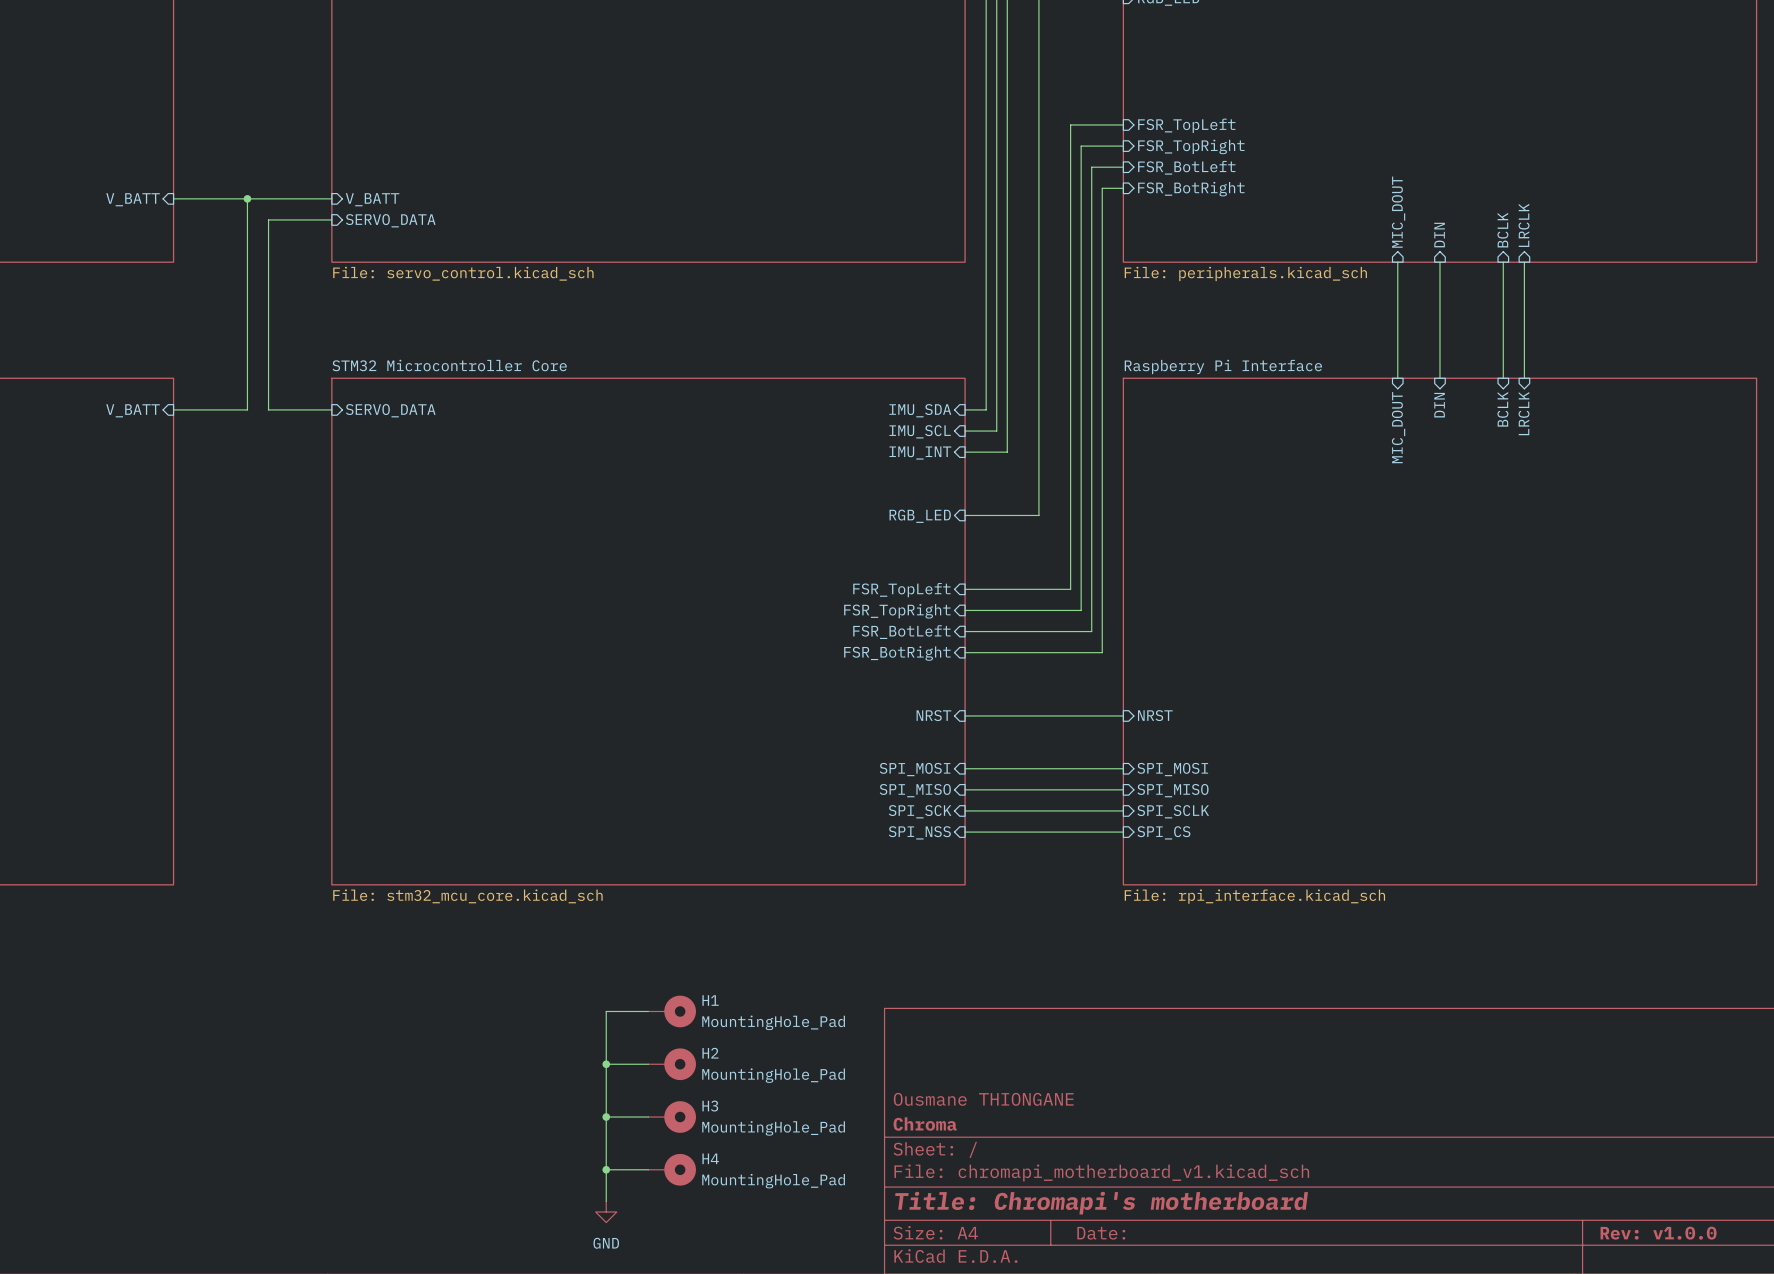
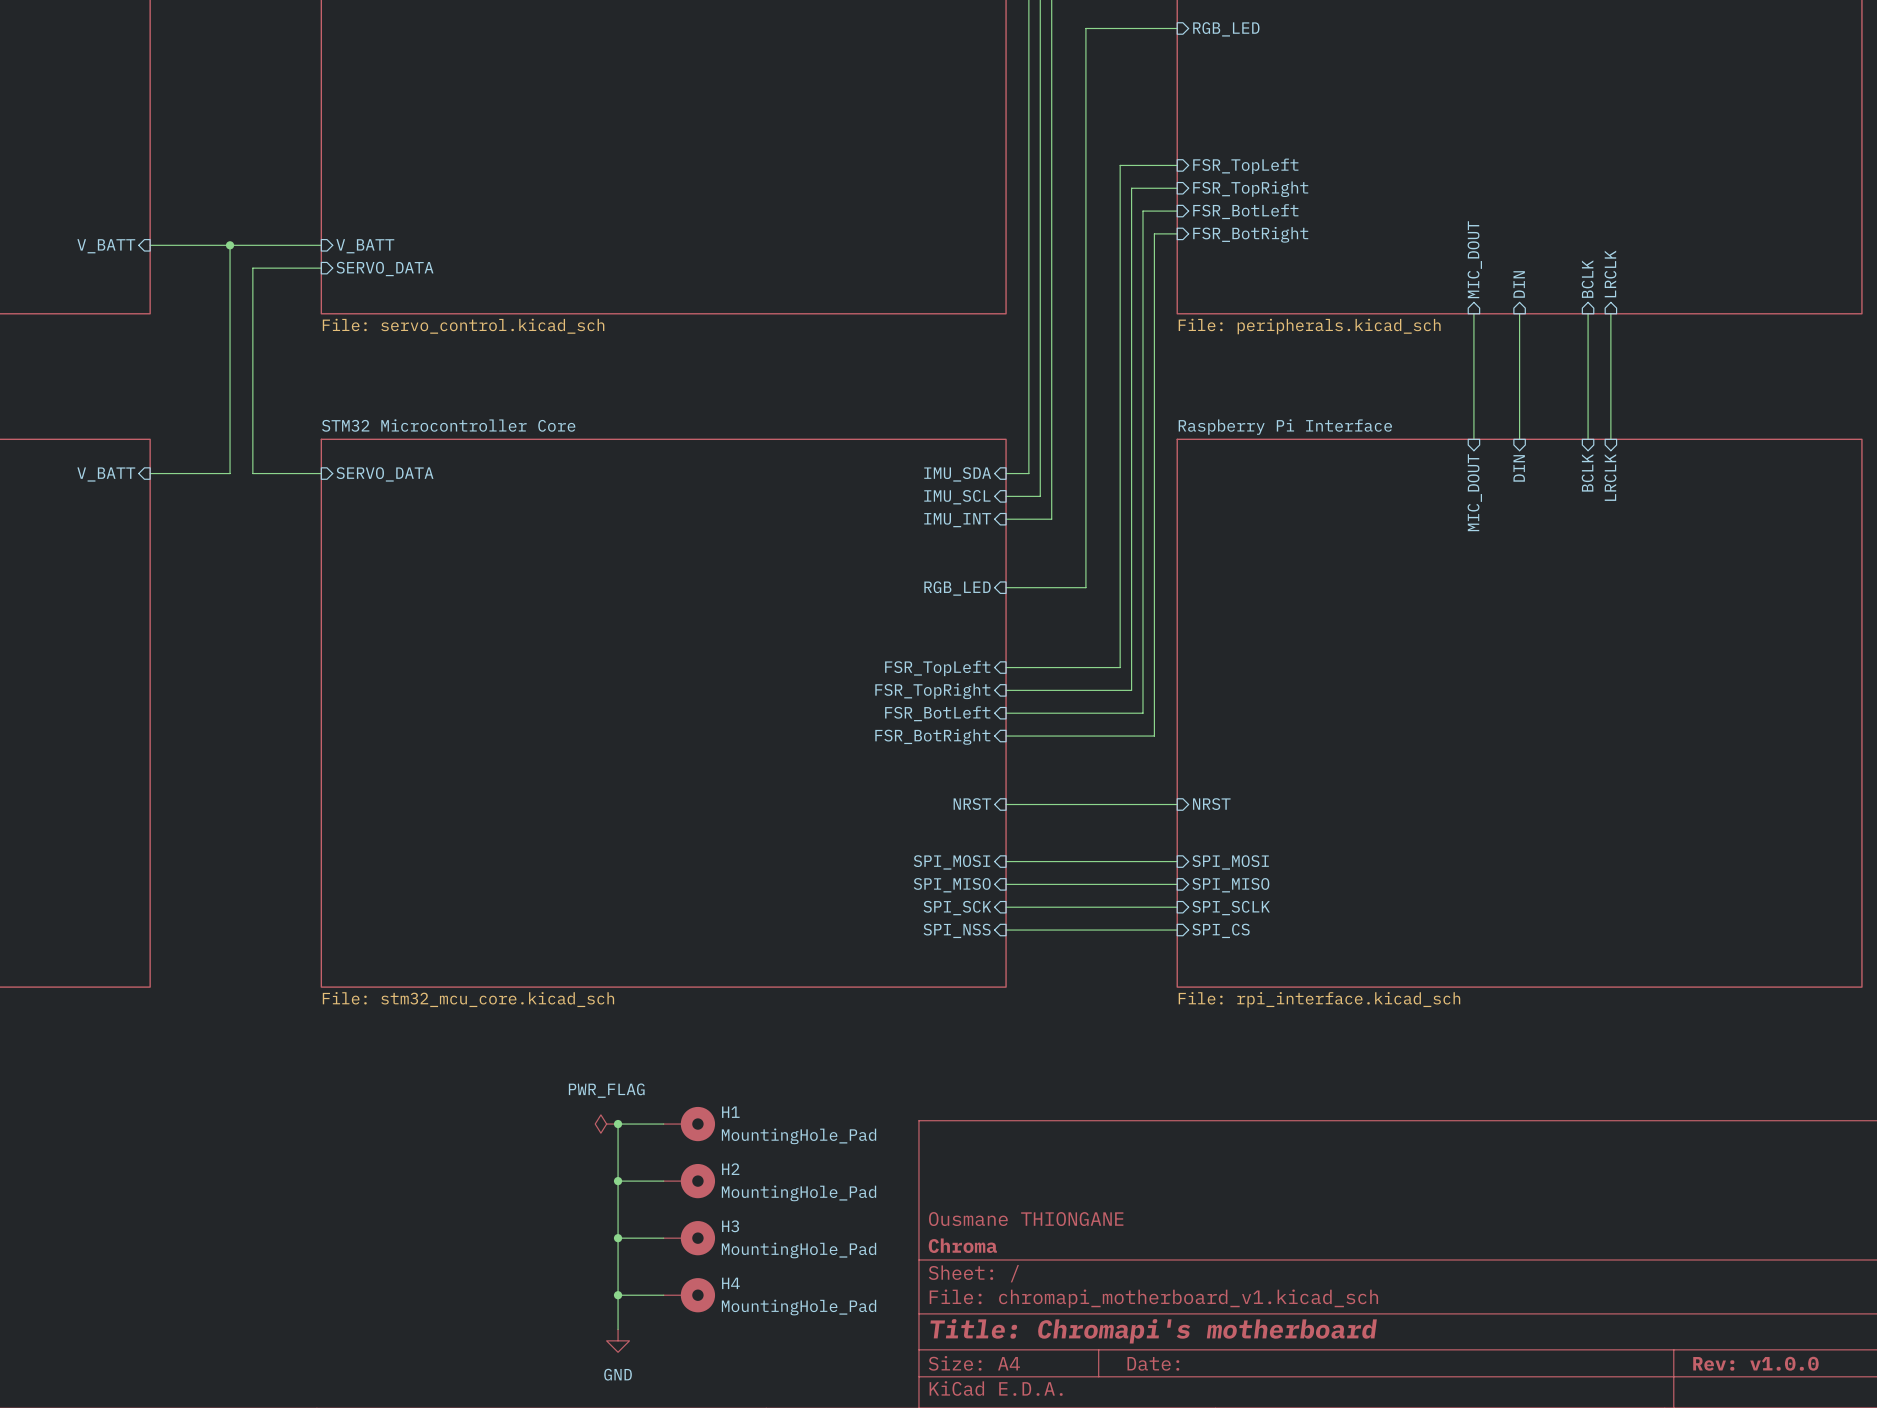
power symbol: none -> PWR_FLAG (606, 1124)
junction: none -> (618, 1124)

